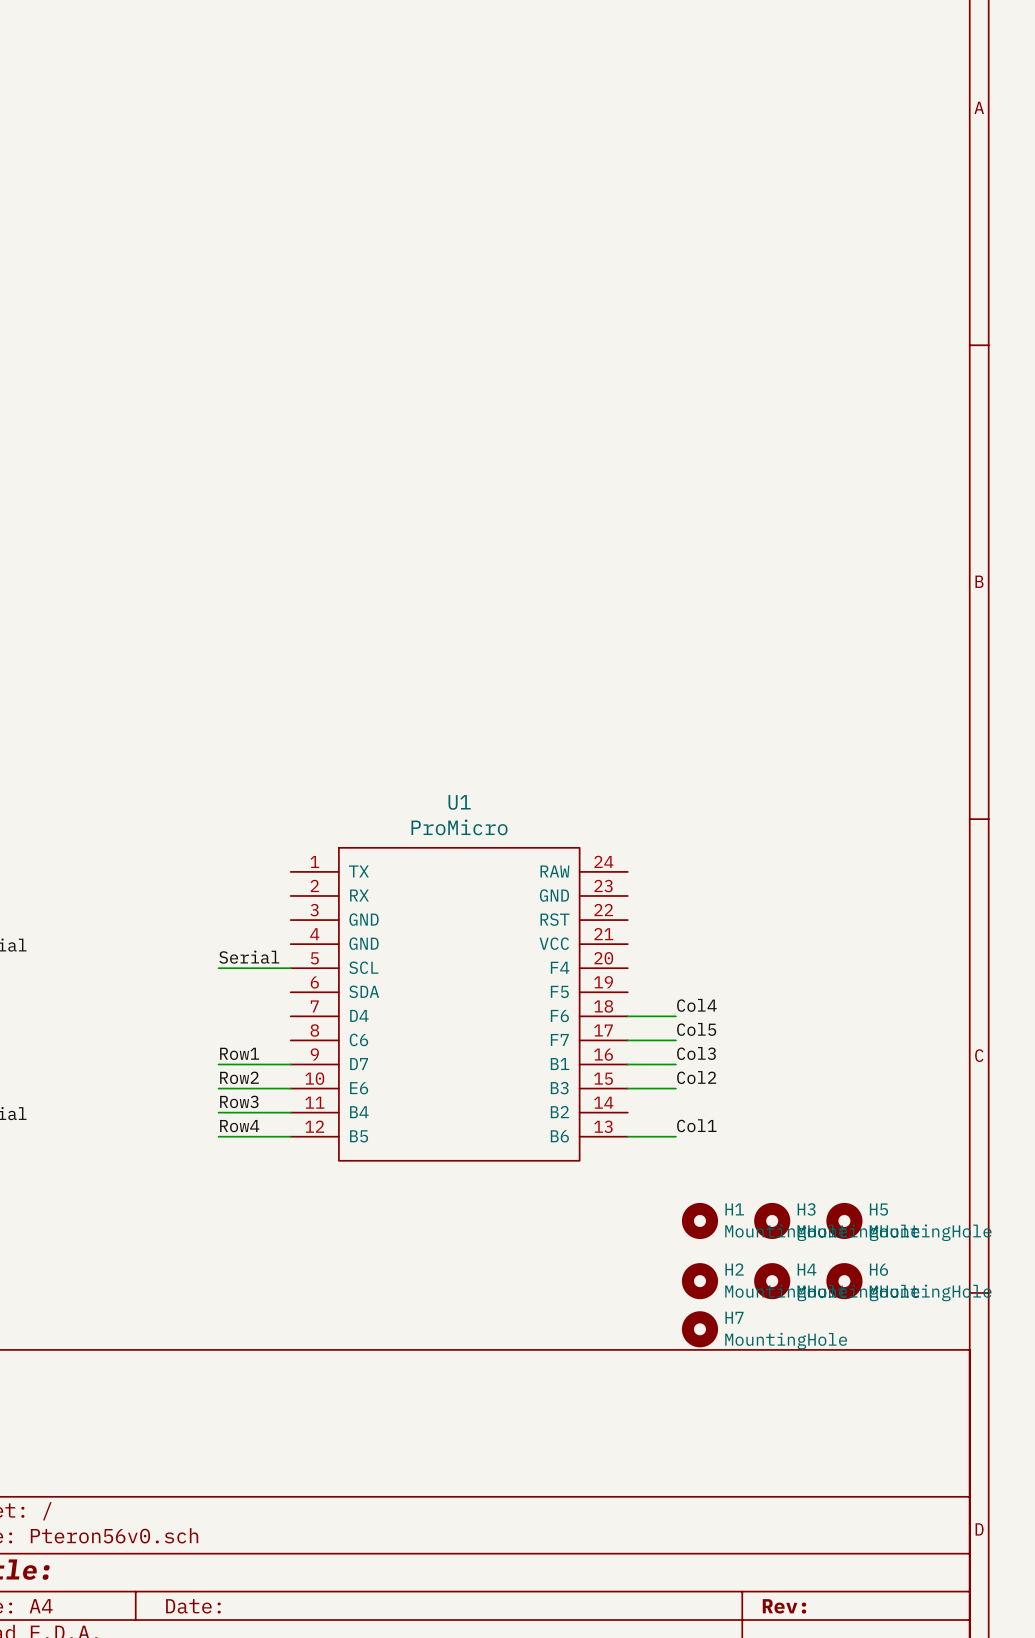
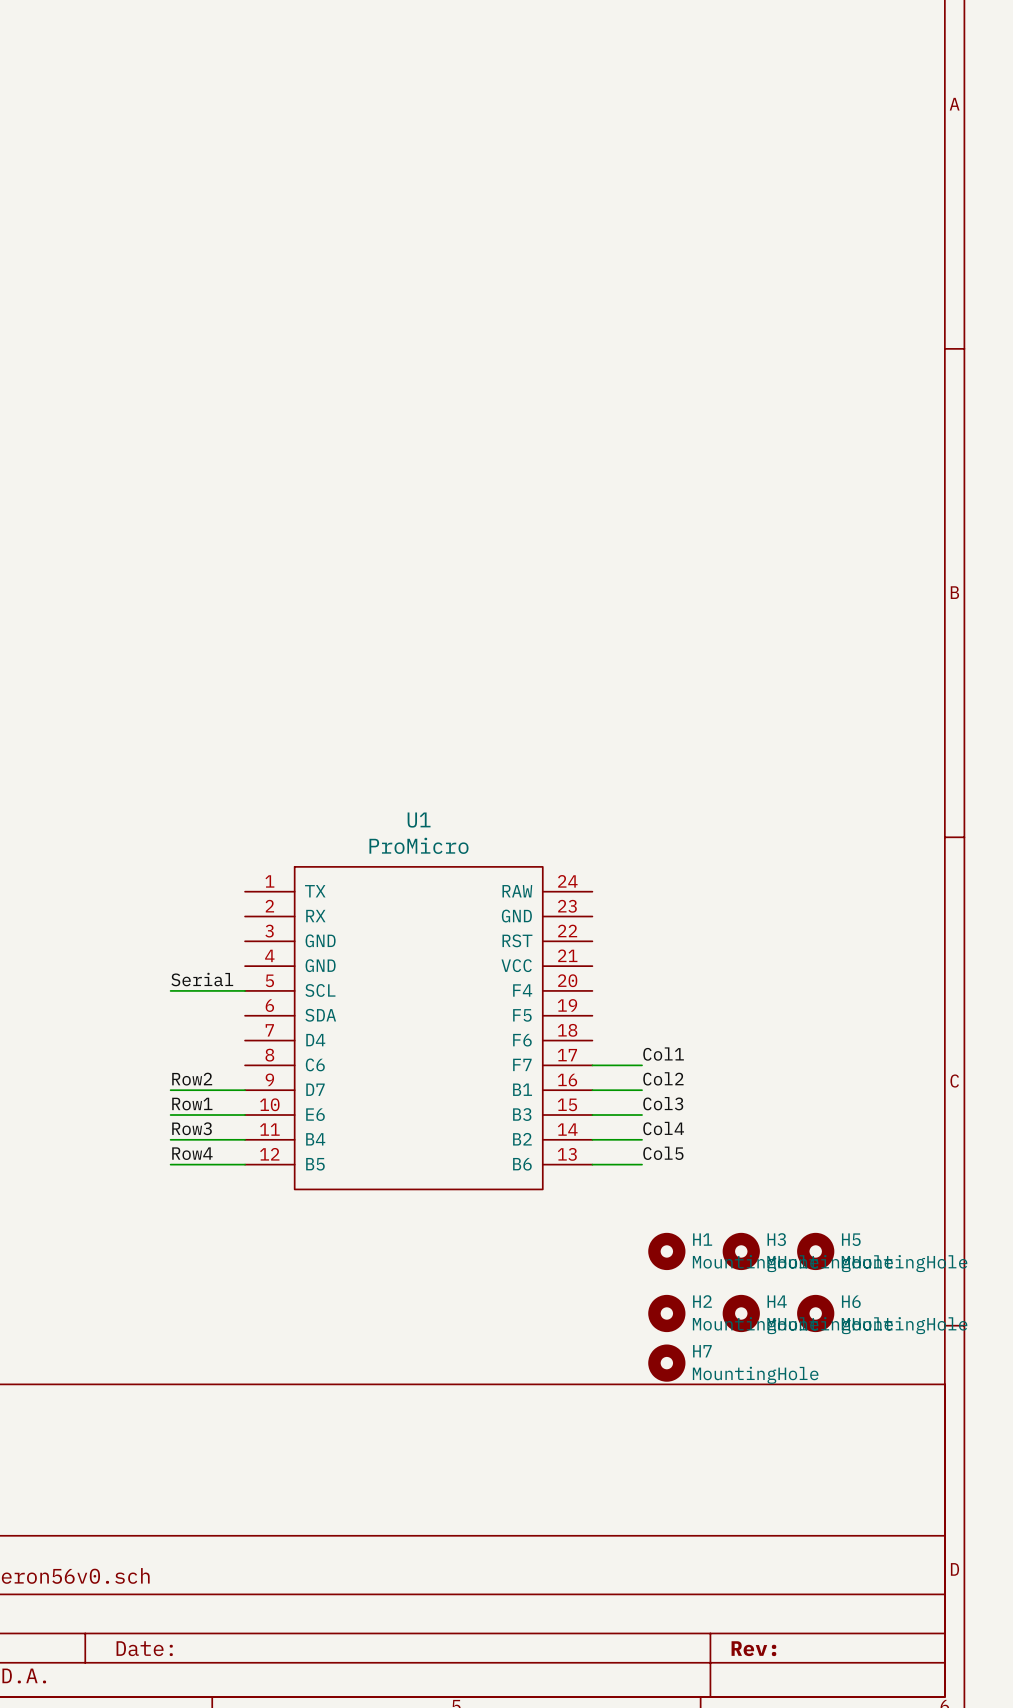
label position: Col4 (696, 1005) -> Col4 (663, 1128)
wire: (627, 1016) (675, 1016) -> (592, 1139) (642, 1139)
label: Col5 (696, 1029) -> Col1 (663, 1054)
label: Row1 (239, 1053) -> Row2 (192, 1079)
label: Col3 (696, 1053) -> Col2 (663, 1078)
label: Row2 (239, 1077) -> Row1 (192, 1104)
label: Col2 (696, 1077) -> Col3 (663, 1103)
label: Col1 (696, 1125) -> Col5 (663, 1153)

